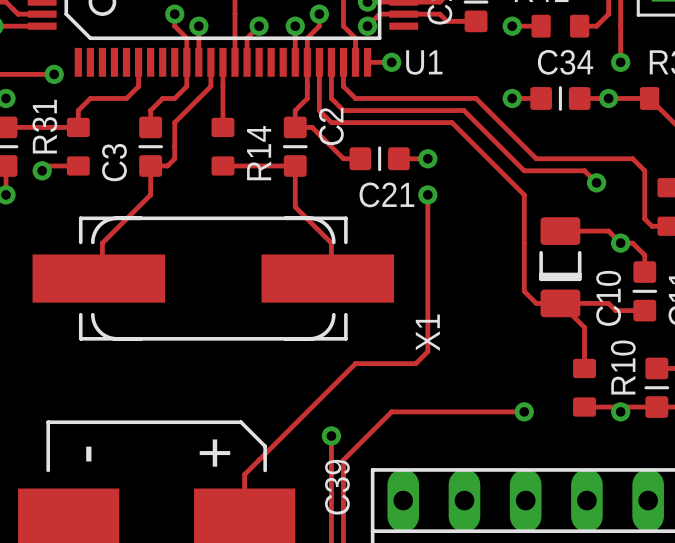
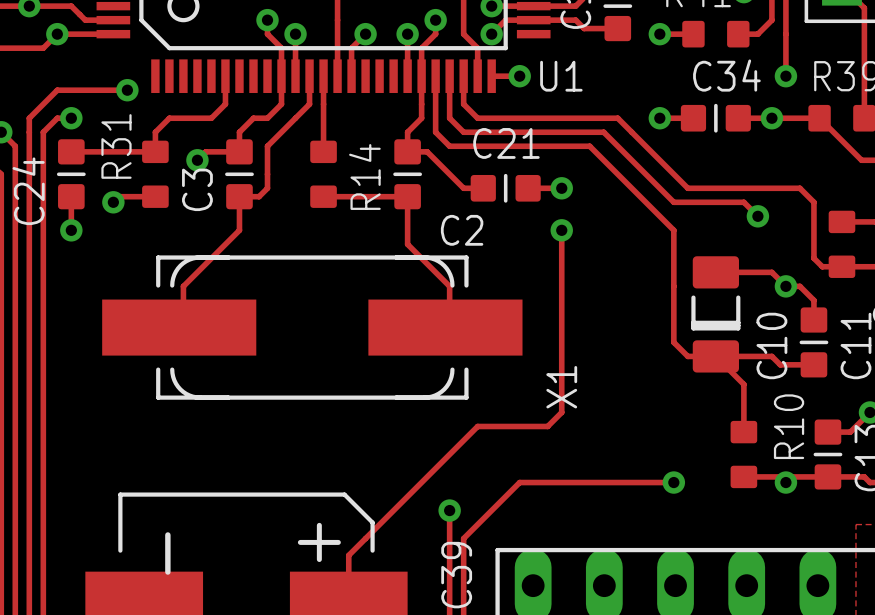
C2 name rotation: 0° (331, 126) -> 90° clockwise (462, 230)
C2 name position: C2 (331, 126) -> C2 (462, 230)
track: none -> (239, 151) (205, 151) (197, 160)
via: none -> (197, 160)
C21 name position: C21 (386, 194) -> C21 (506, 143)

